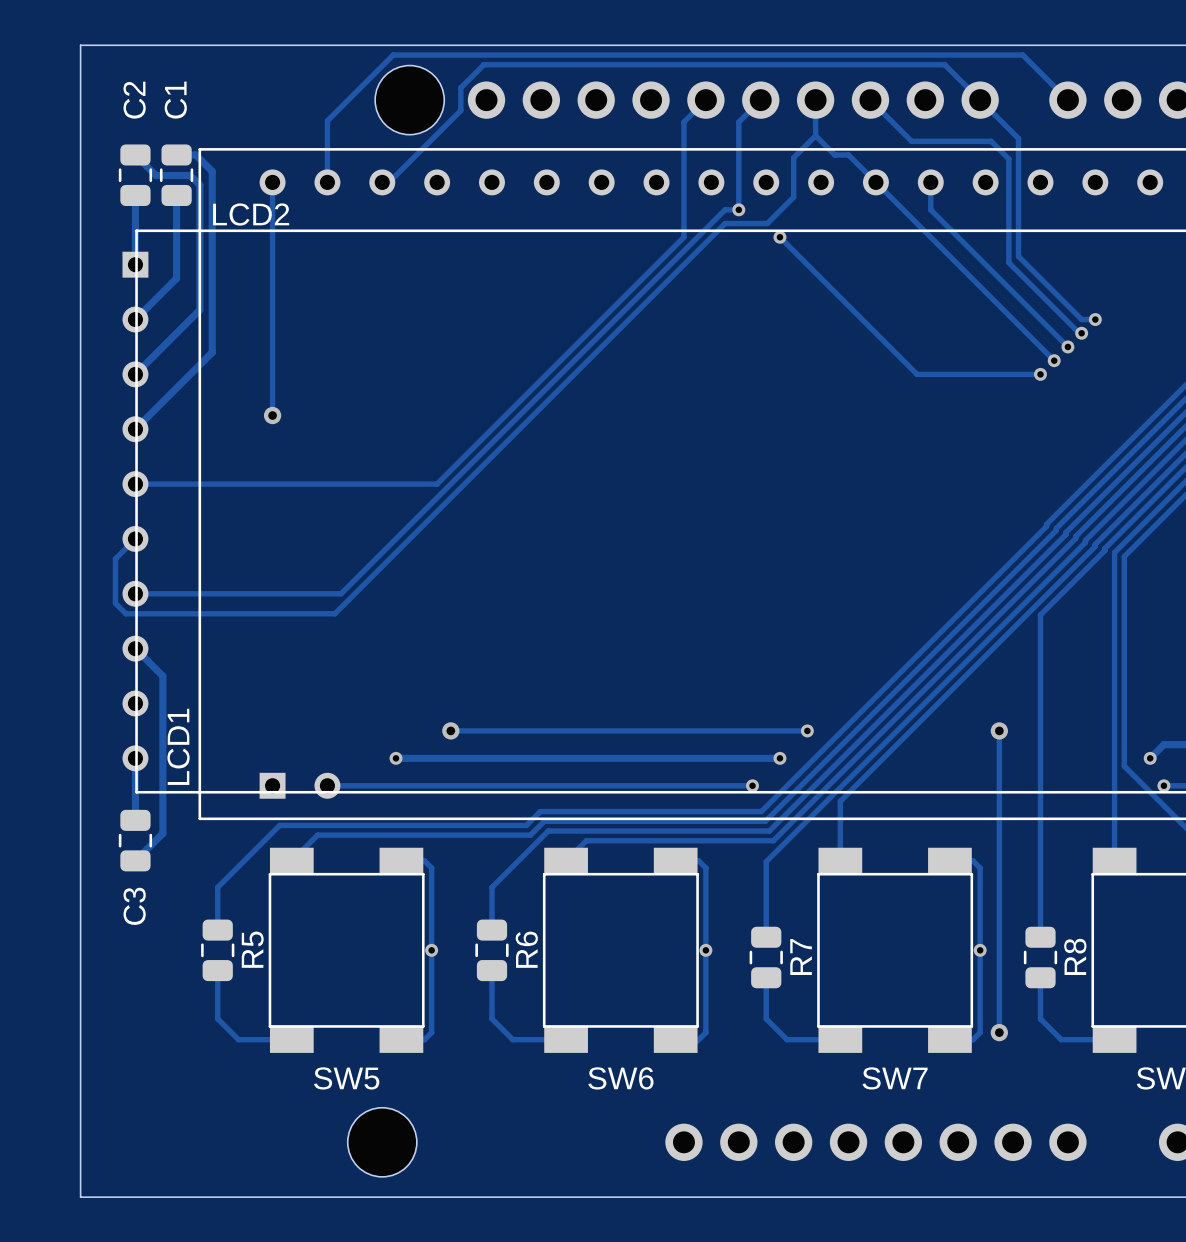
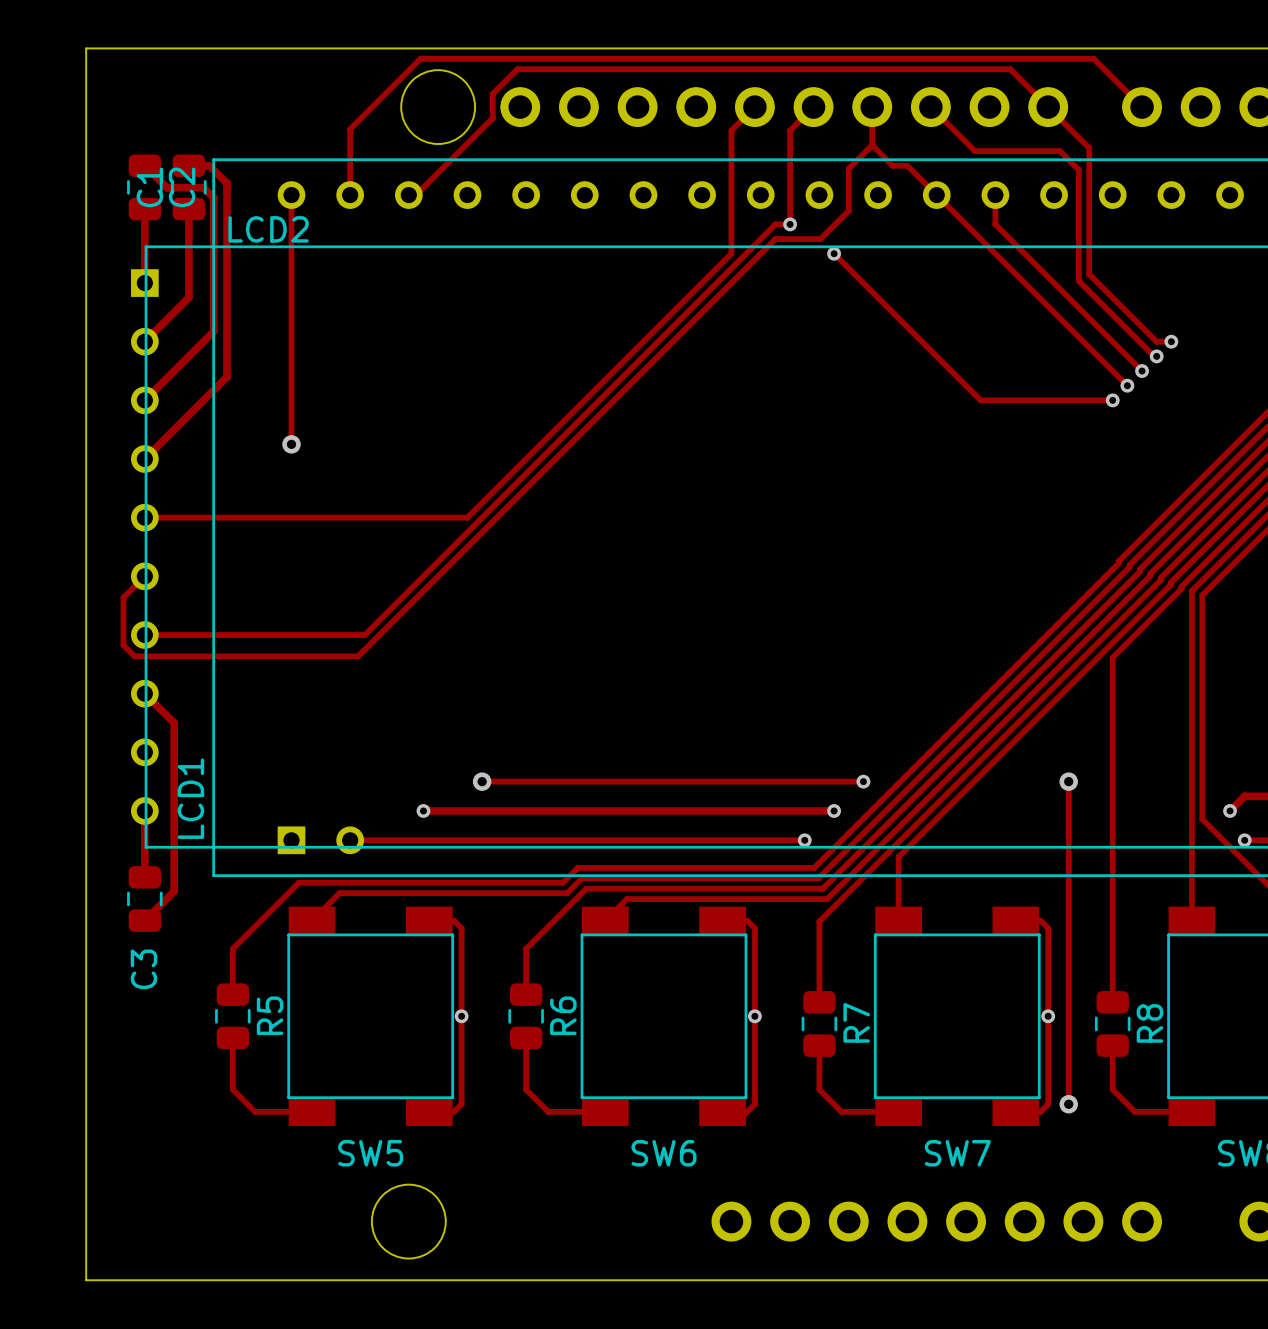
C2 name position: C2 (134, 100) -> C2 (182, 187)
C1 name position: C1 (175, 100) -> C1 (149, 187)

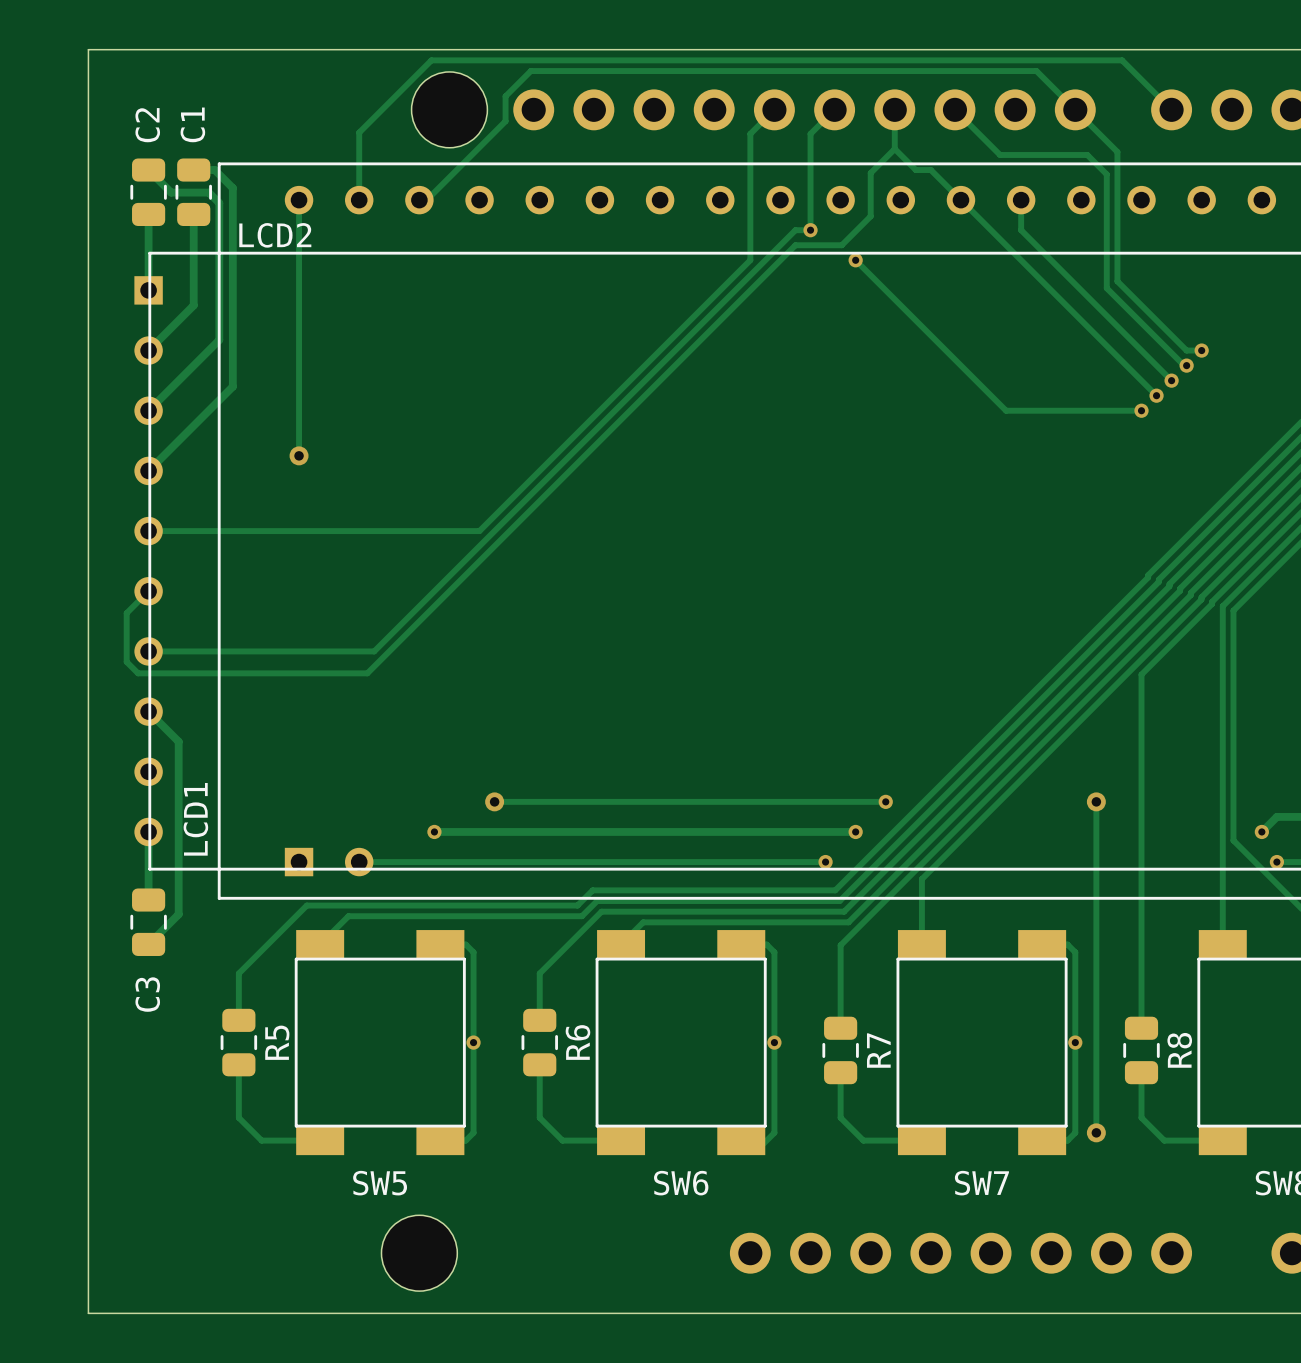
C1 name position: C1 (149, 187) -> C1 (192, 124)
C2 name position: C2 (182, 187) -> C2 (147, 125)

